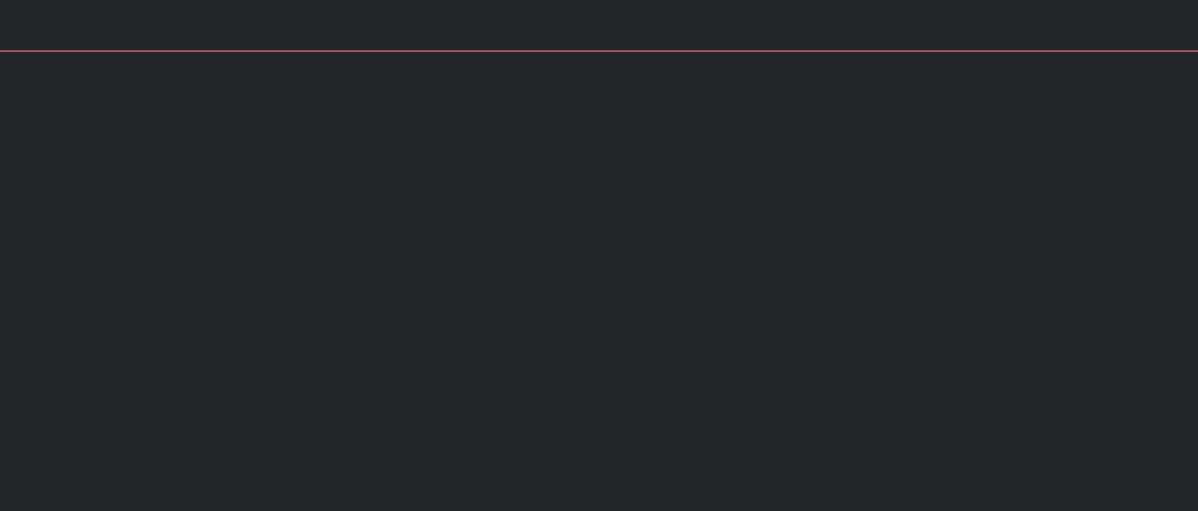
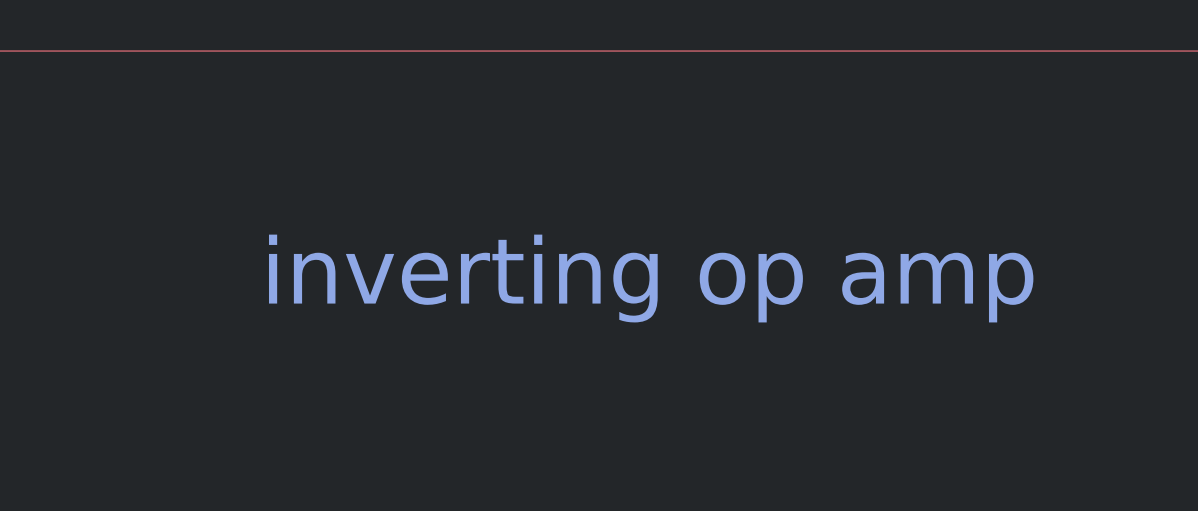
text: none -> inverting op amp (651, 278)

